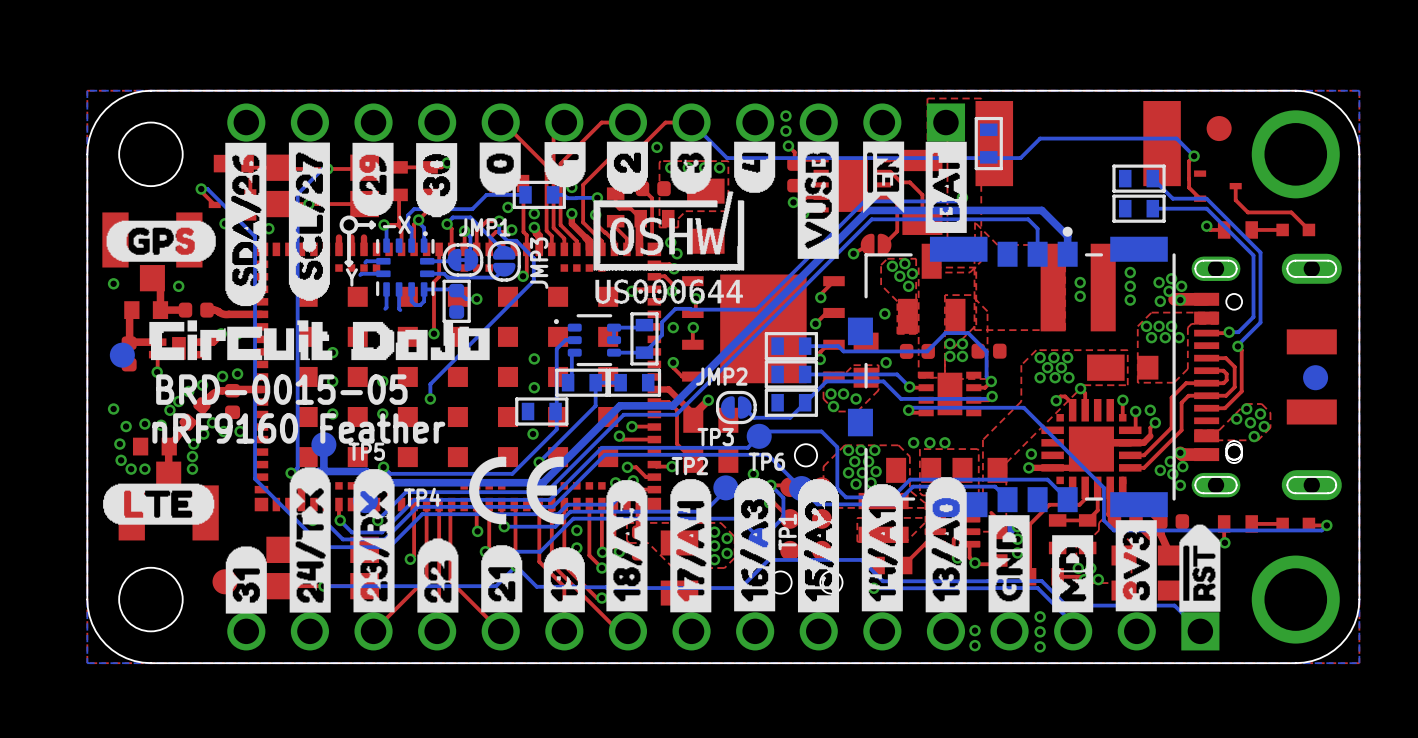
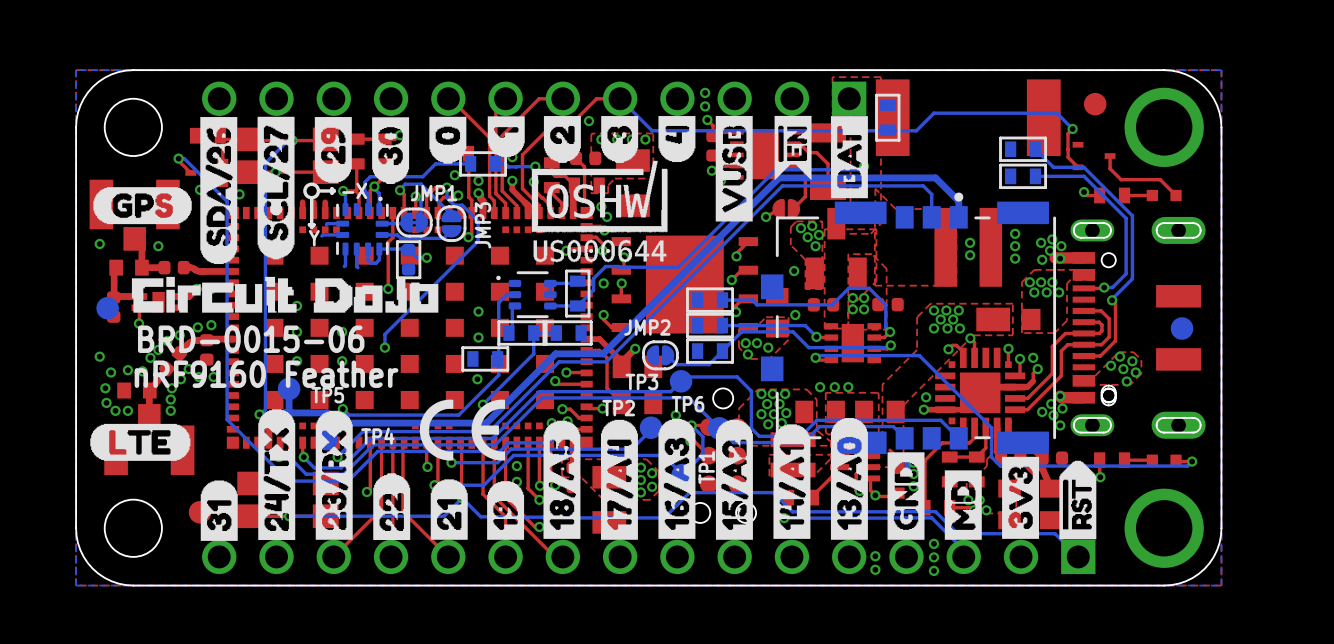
text: BRD-0015-05 (281, 389) -> BRD-0015-06 (251, 339)

